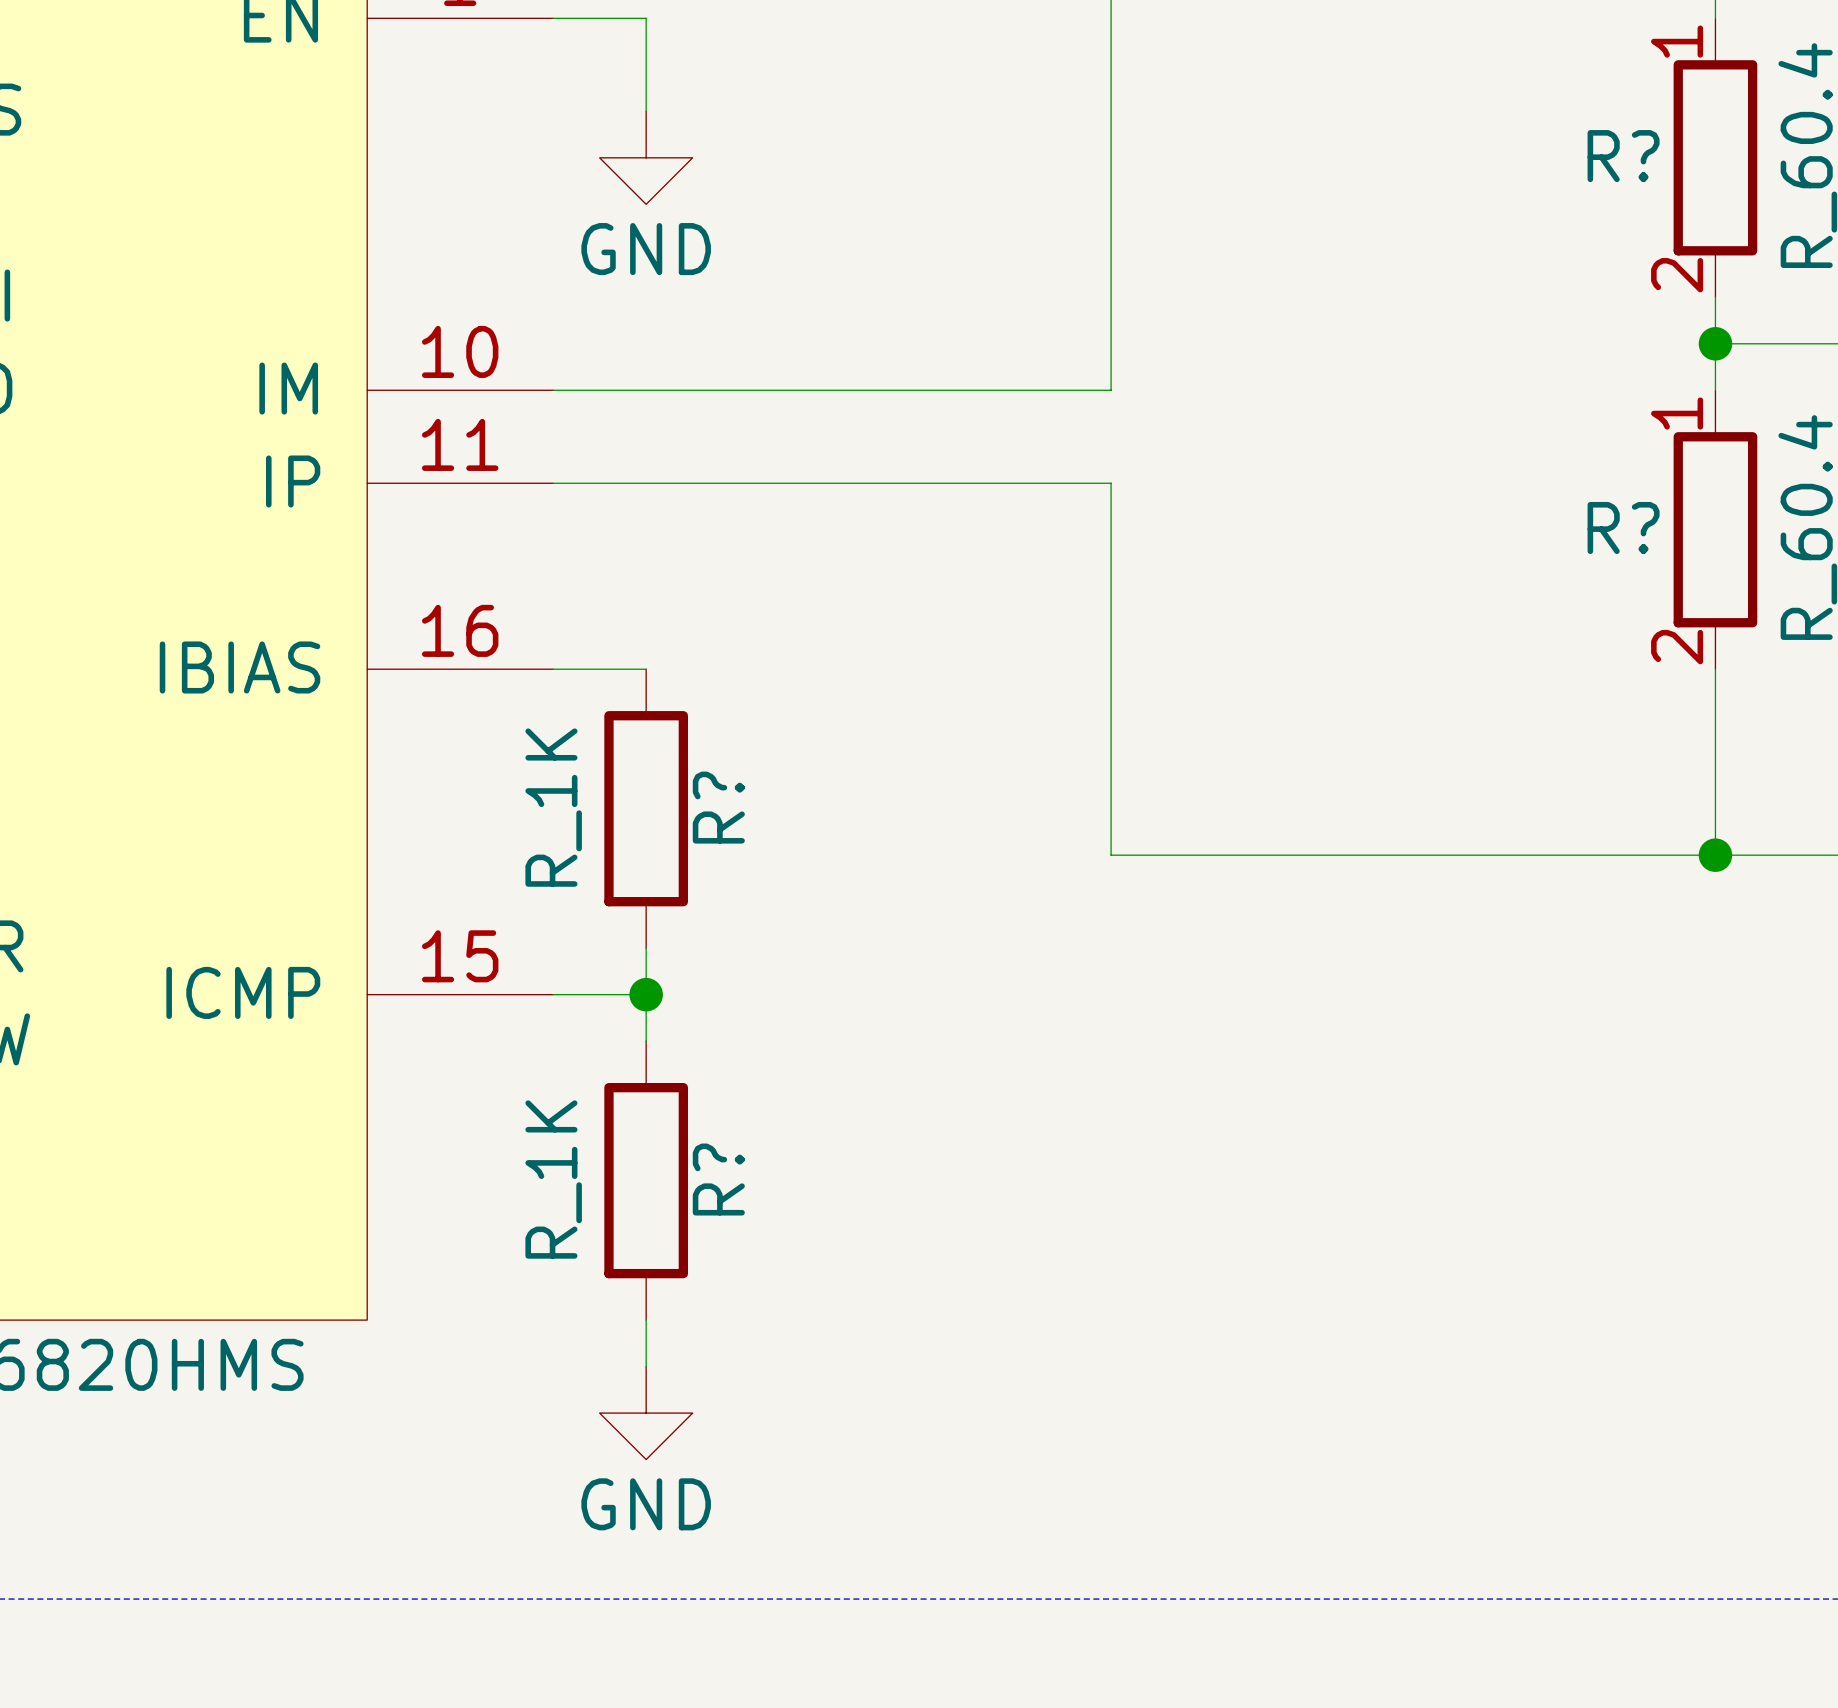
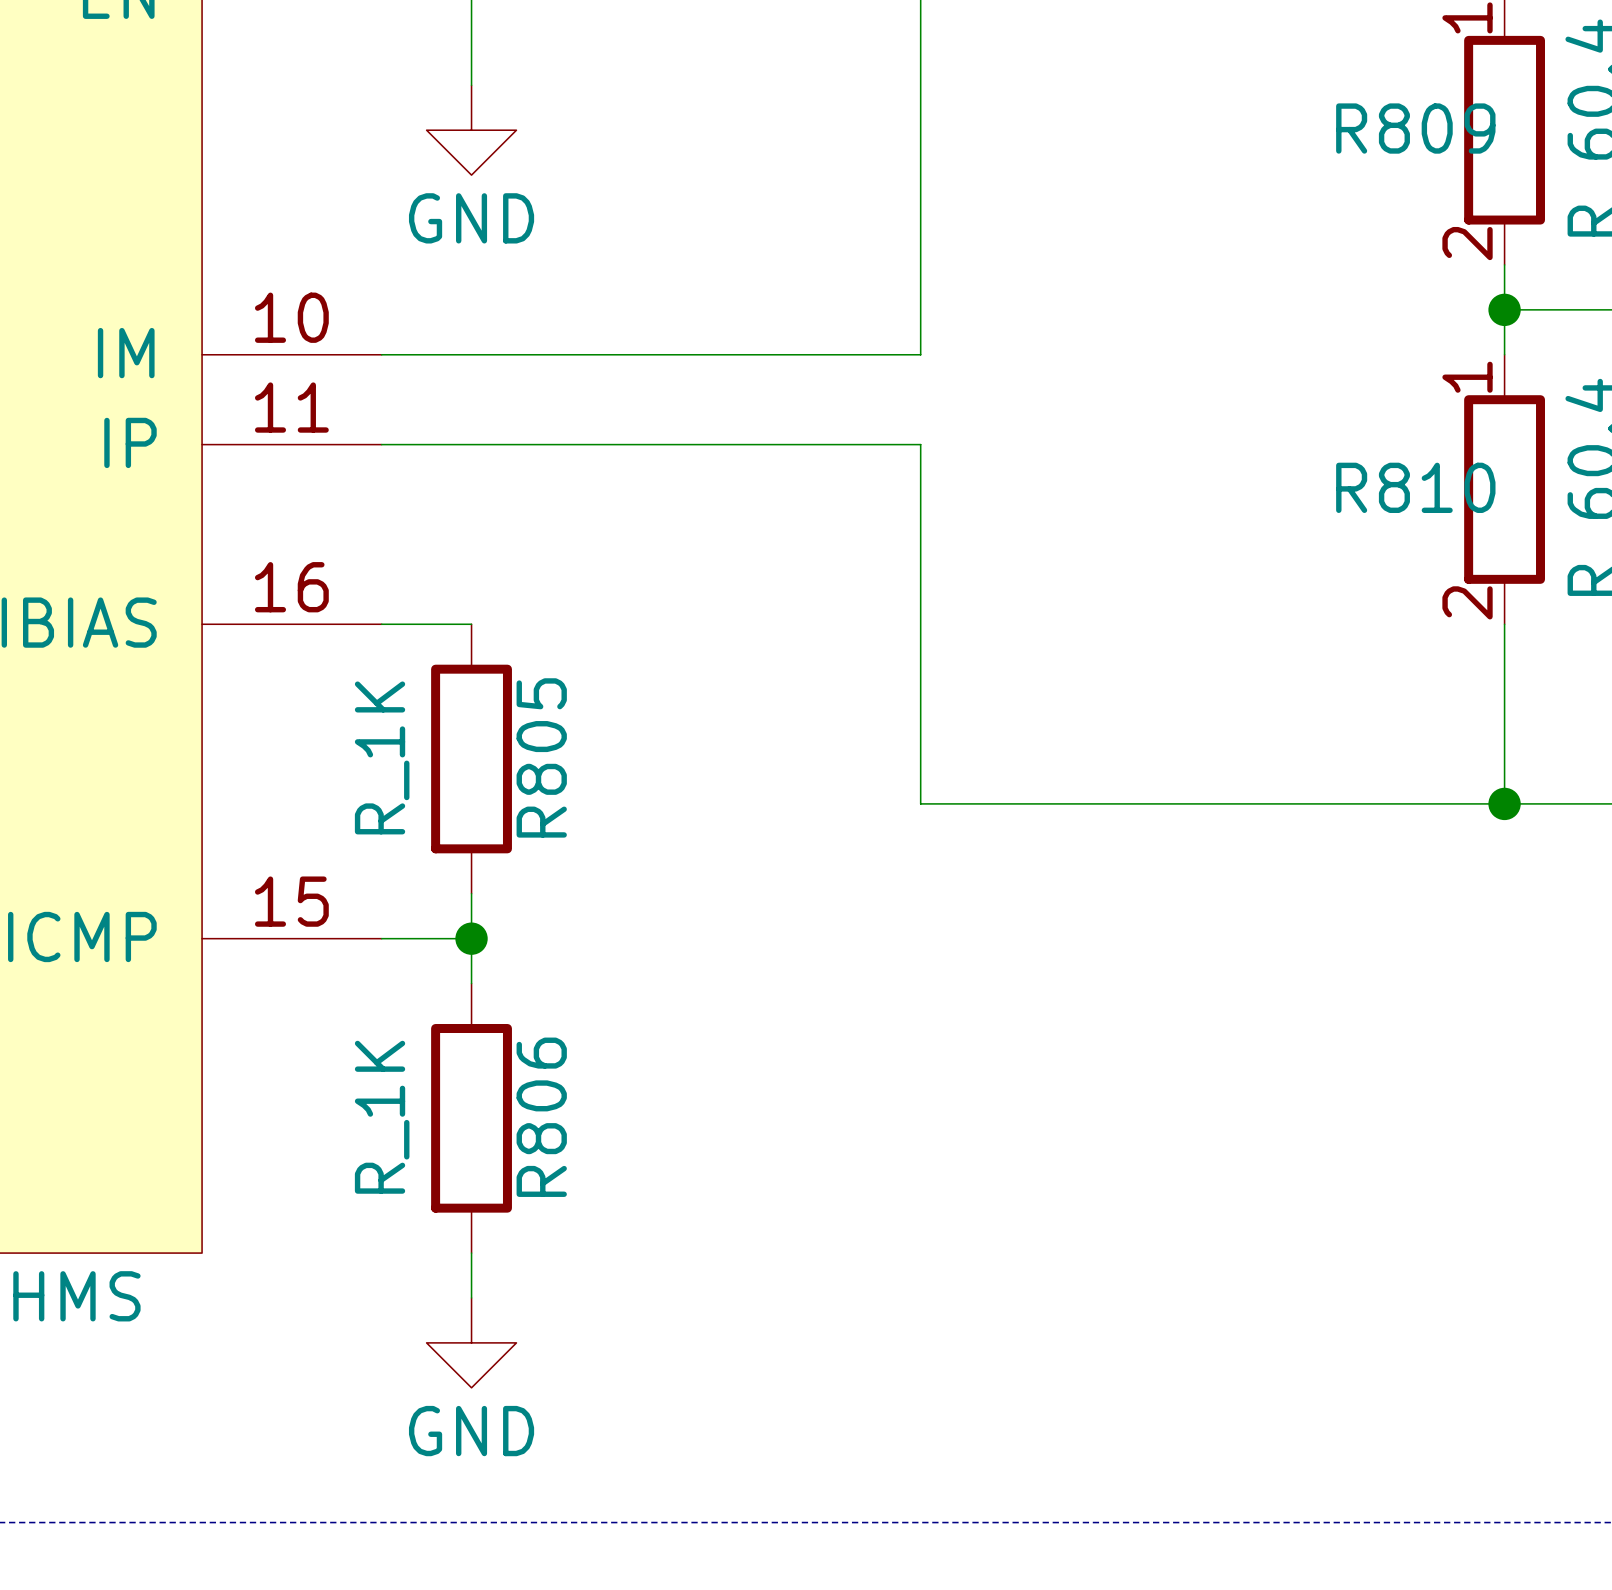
R? name: R? (1623, 156) -> R809 (1415, 128)
R? name: R? (1623, 528) -> R810 (1415, 487)
R? name: R? (718, 807) -> R805 (541, 757)
R? name: R? (718, 1179) -> R806 (541, 1117)

